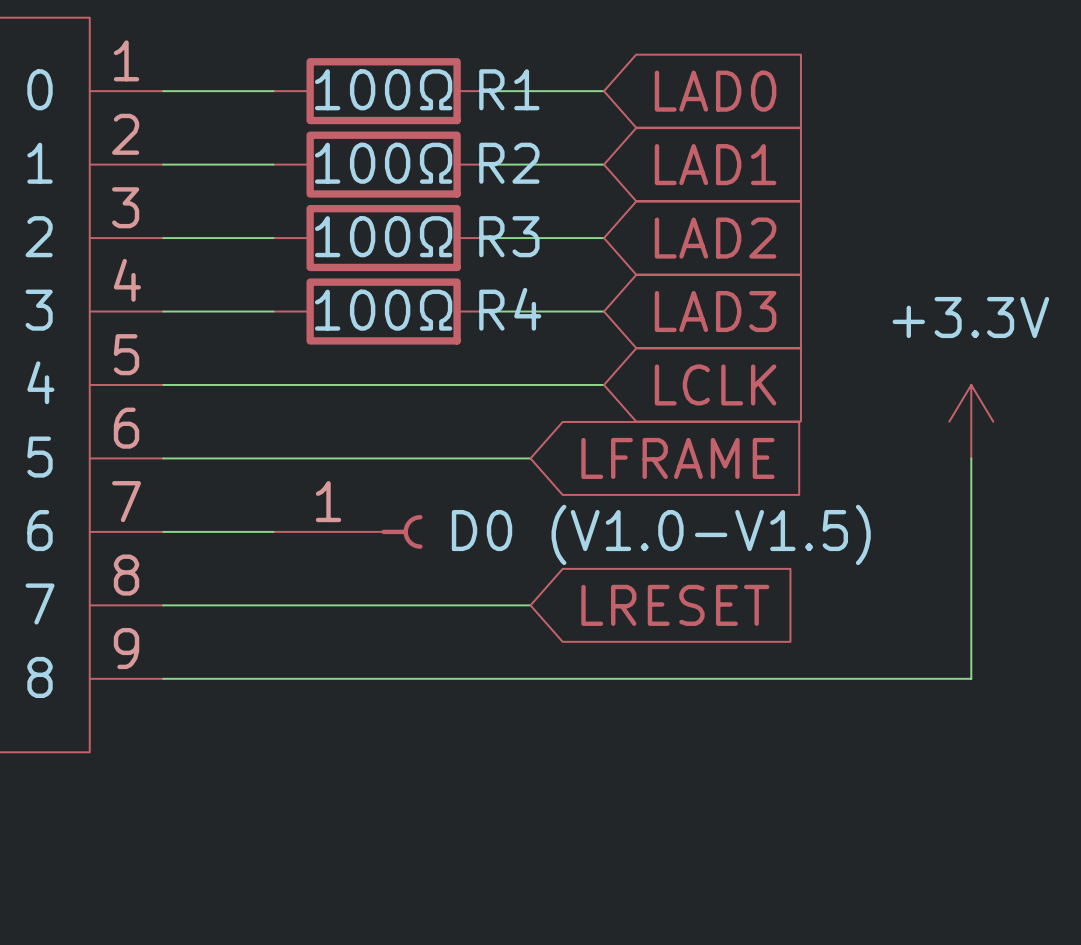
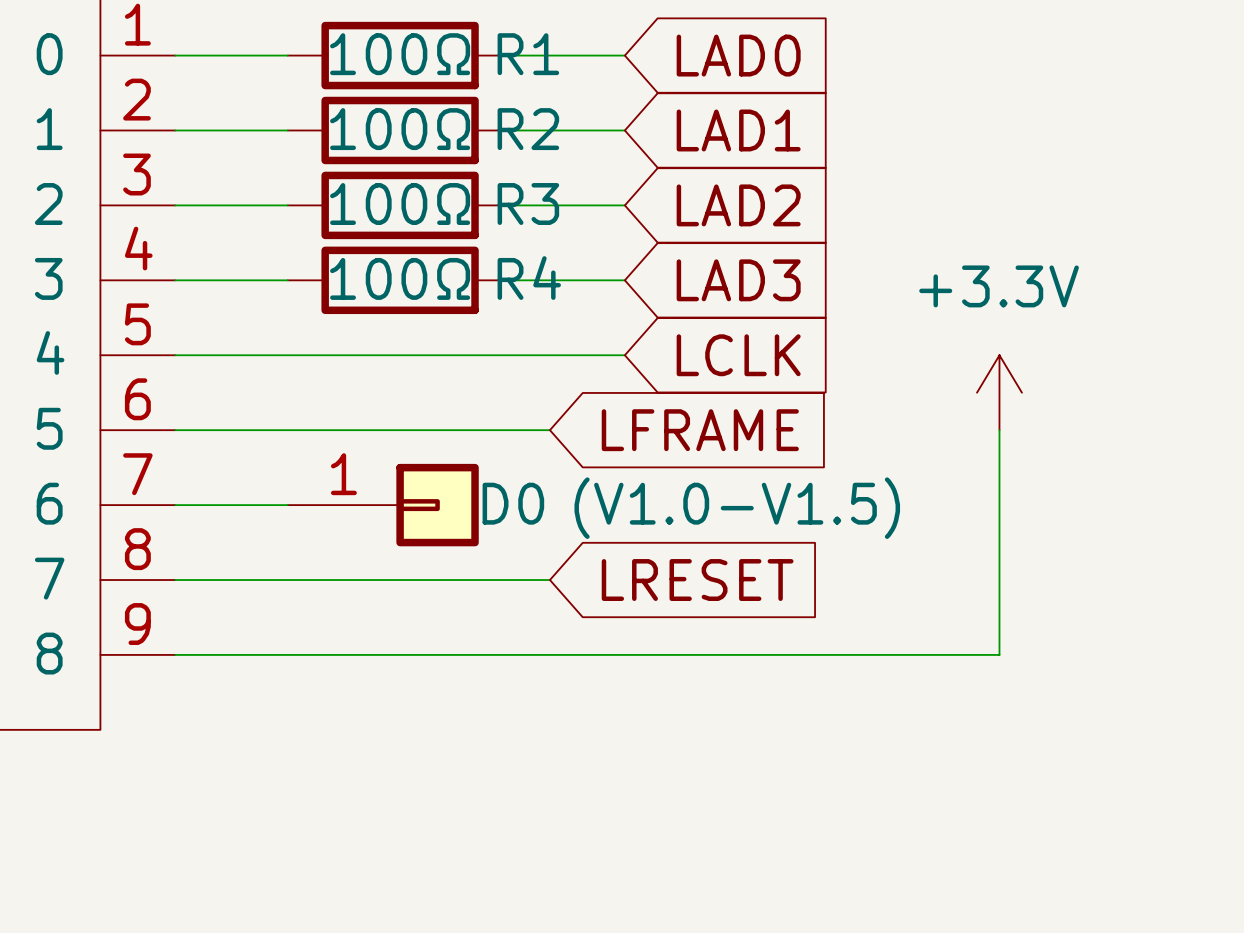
part: D0 (V1.0-V1.5) (347, 531) -> none
D0: none -> (V1.0-V1.5) (383, 505)

